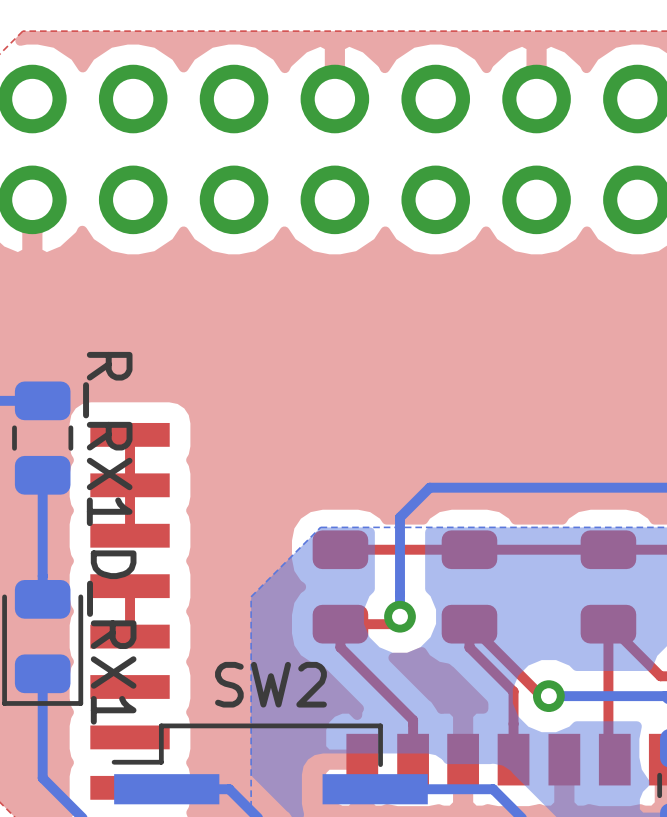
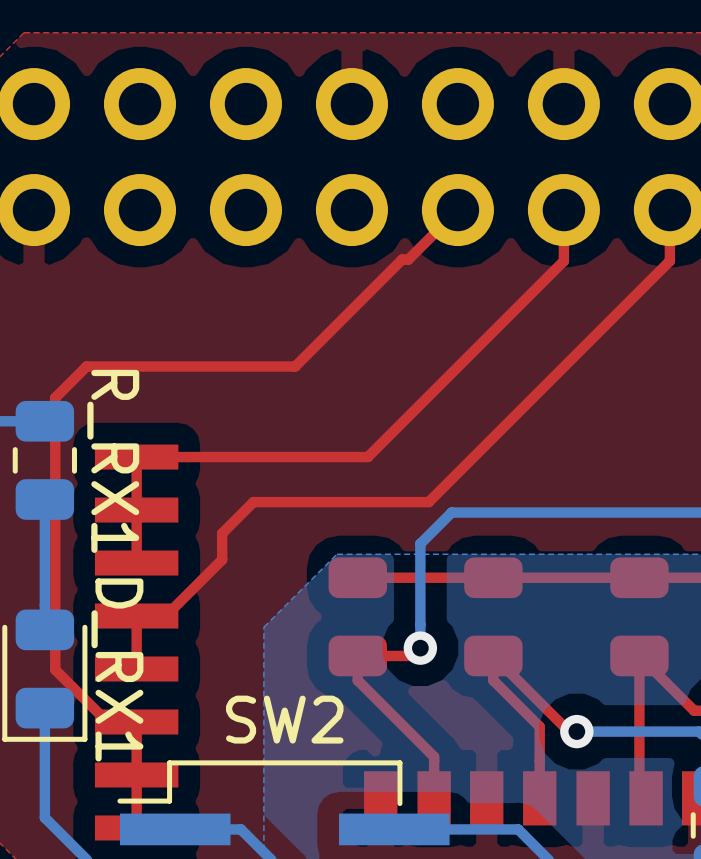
top track: none -> (457, 210) (408, 259) (402, 259) (295, 366) (86, 366) (55, 397) (55, 669) (107, 721) (136, 721) (136, 827)
top track: none -> (563, 210) (563, 261) (367, 457) (136, 457)
top track: none -> (669, 210) (669, 261) (428, 502) (253, 502) (222, 533) (222, 559) (165, 616) (136, 616)

